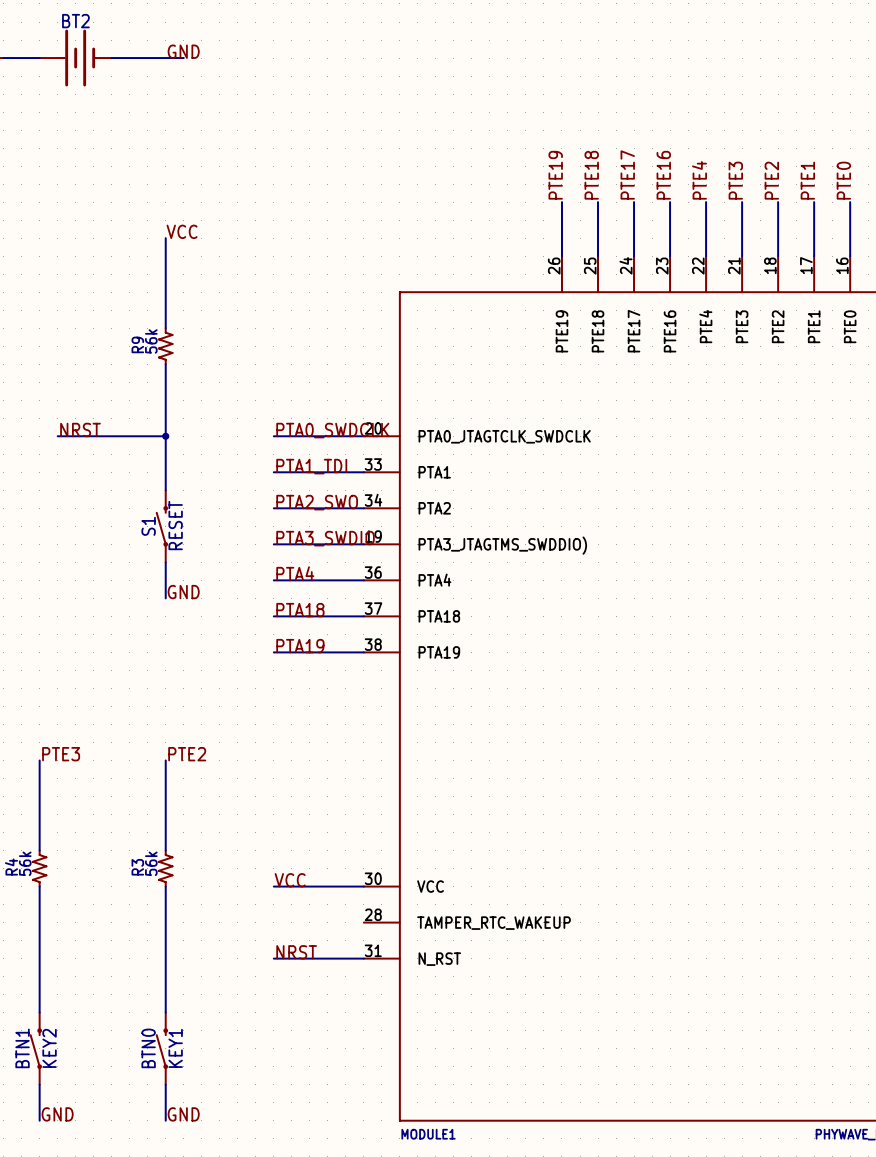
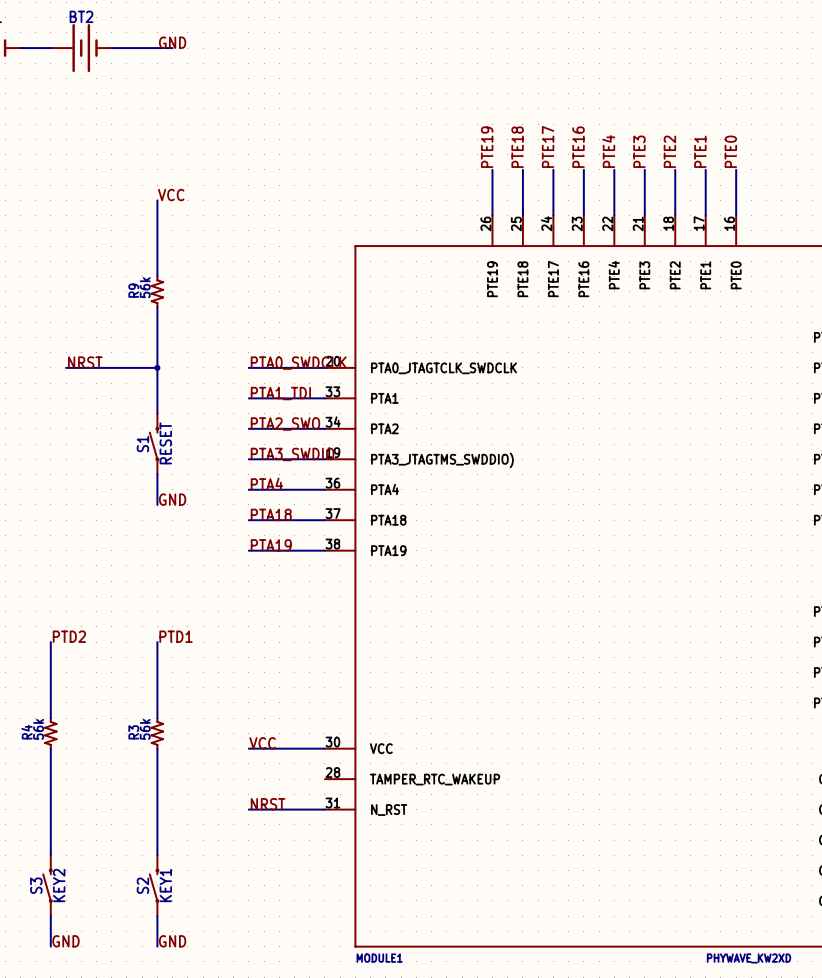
label: PTE3 (61, 754) -> PTD2 (69, 636)
label: PTE2 (187, 754) -> PTD1 (176, 636)
BTN1 name: BTN1 (22, 1048) -> S3 (36, 885)
BTN0 name: BTN0 (148, 1048) -> S2 (142, 885)

